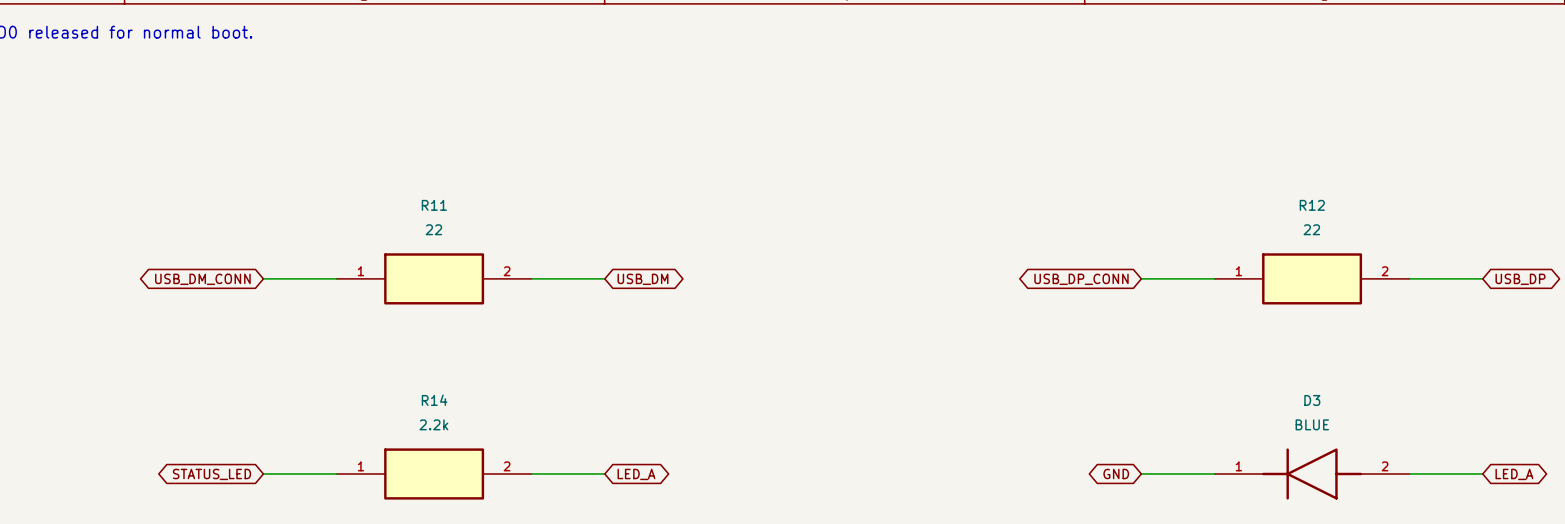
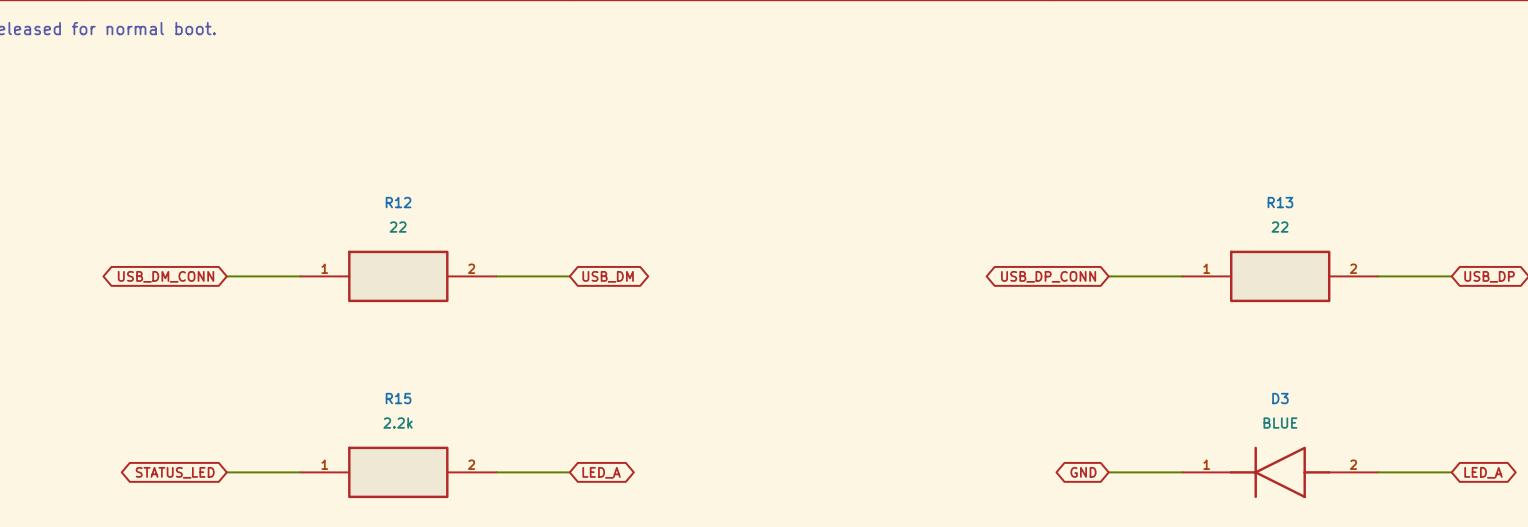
R11 name: R11 (434, 205) -> R12 (398, 202)
R12 name: R12 (1312, 205) -> R13 (1280, 202)
R14 name: R14 (434, 400) -> R15 (398, 398)

